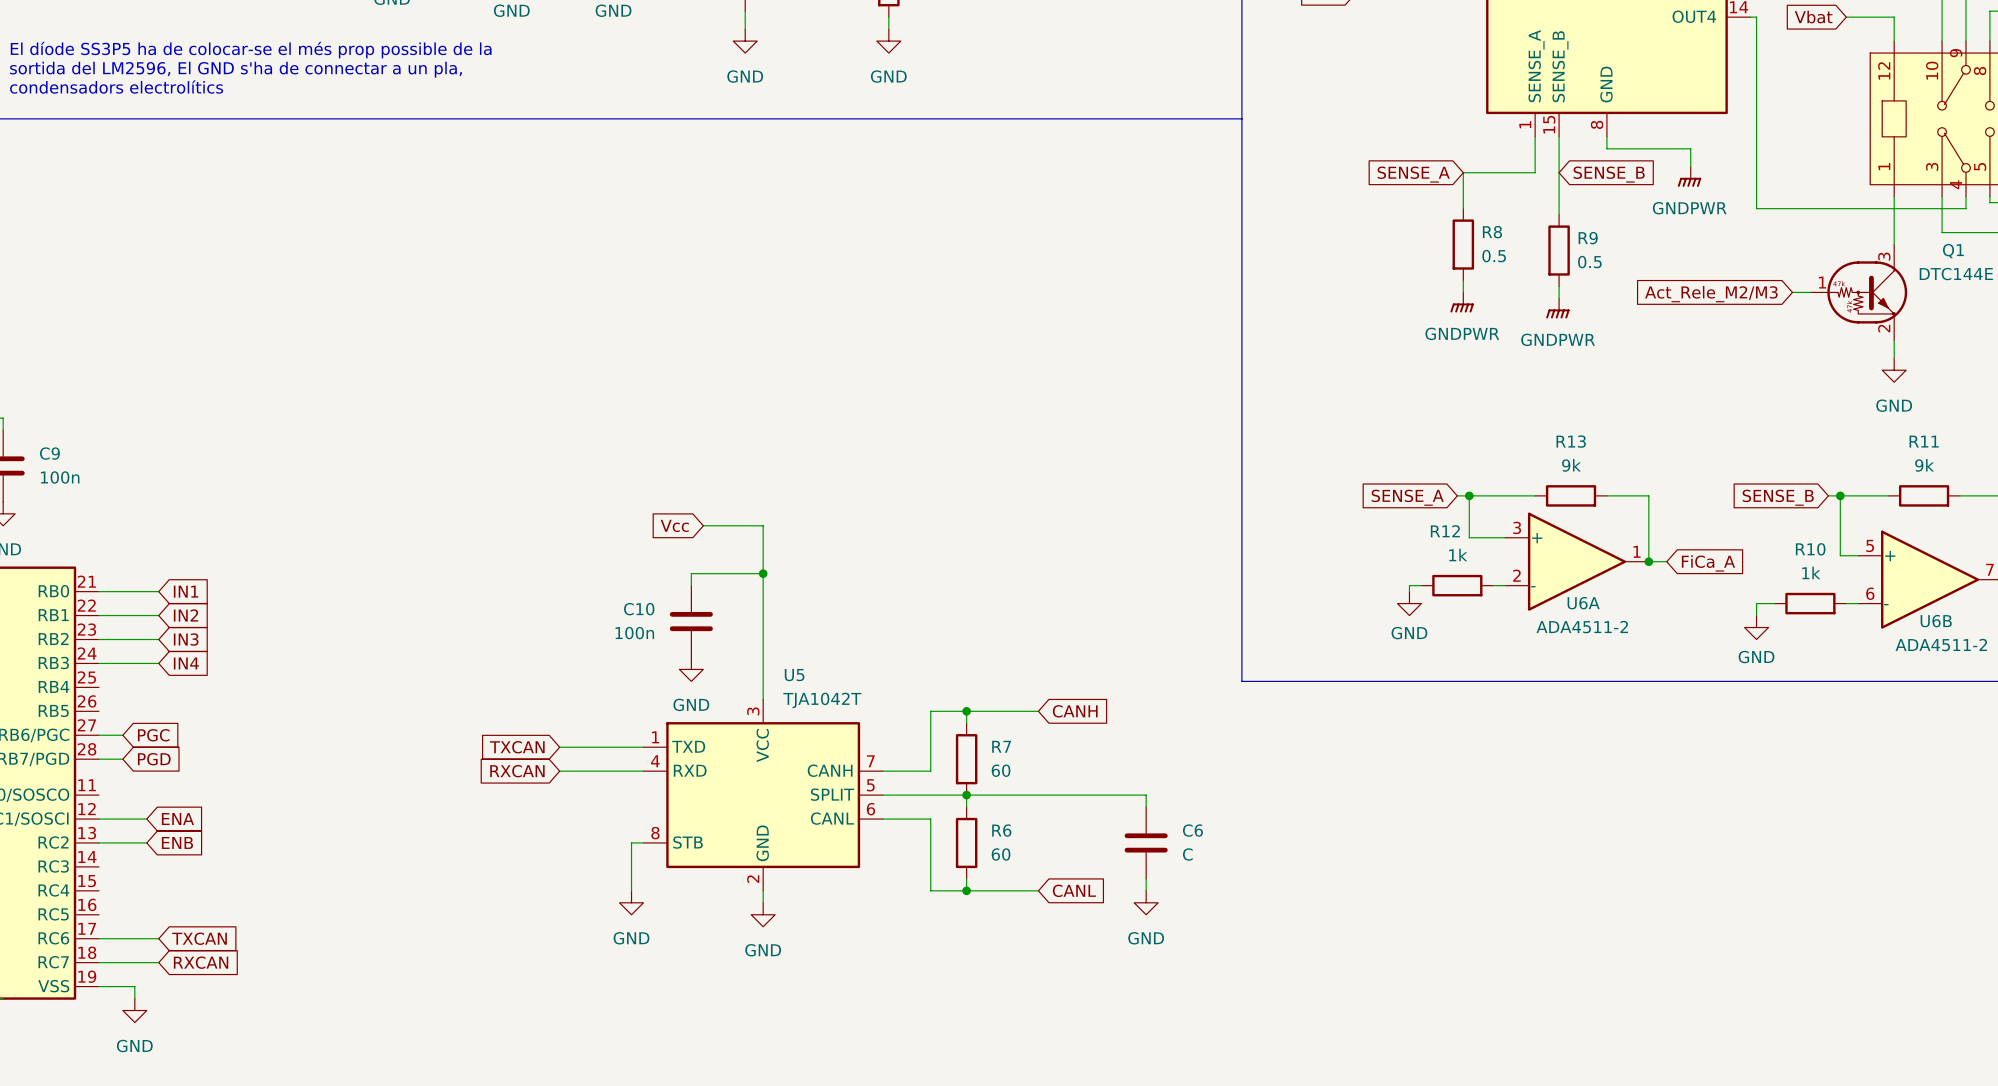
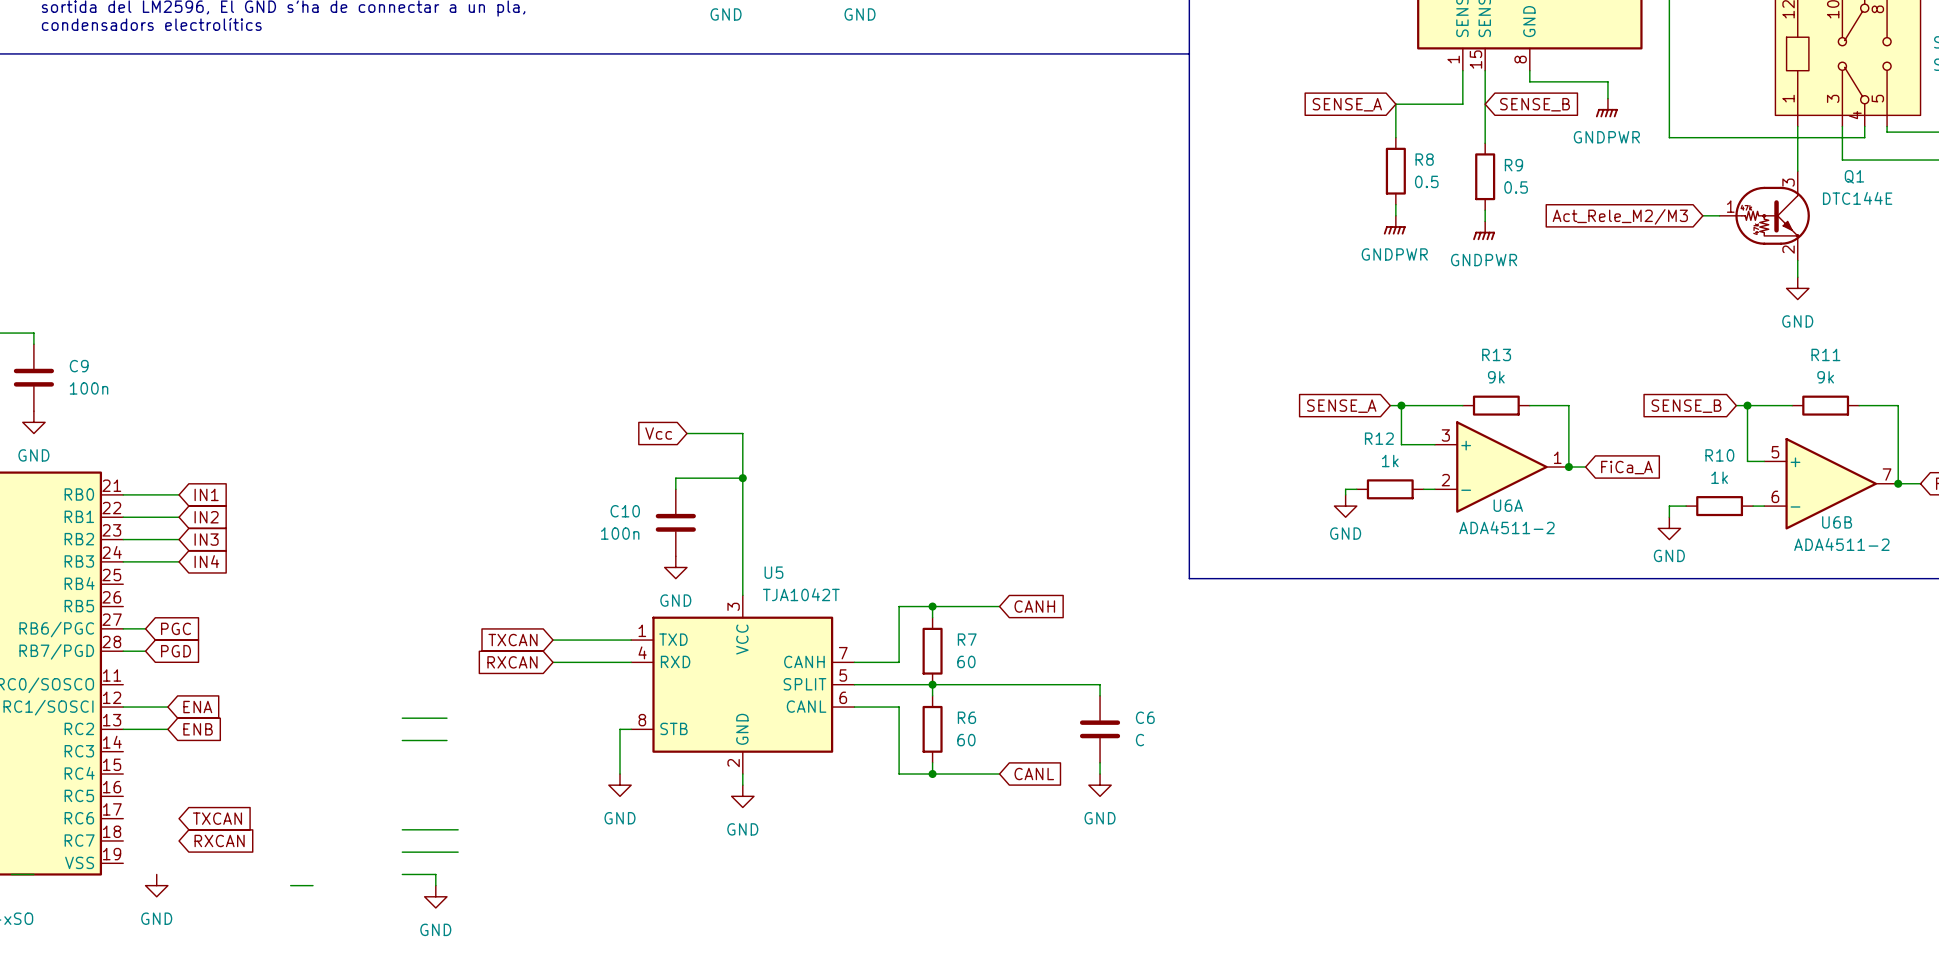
wire: none -> (402, 718) (446, 718)
wire: none -> (402, 740) (446, 740)
wire: (98, 938) (158, 938) -> none
wire: none -> (402, 829) (458, 829)
wire: (98, 962) (158, 962) -> none
wire: none -> (402, 852) (458, 852)
wire: (98, 986) (134, 986) (134, 998) -> none
wire: none -> (402, 874) (435, 874) (435, 885)
wire: none -> (290, 885) (313, 885)
power symbol: none -> GND (435, 896)

